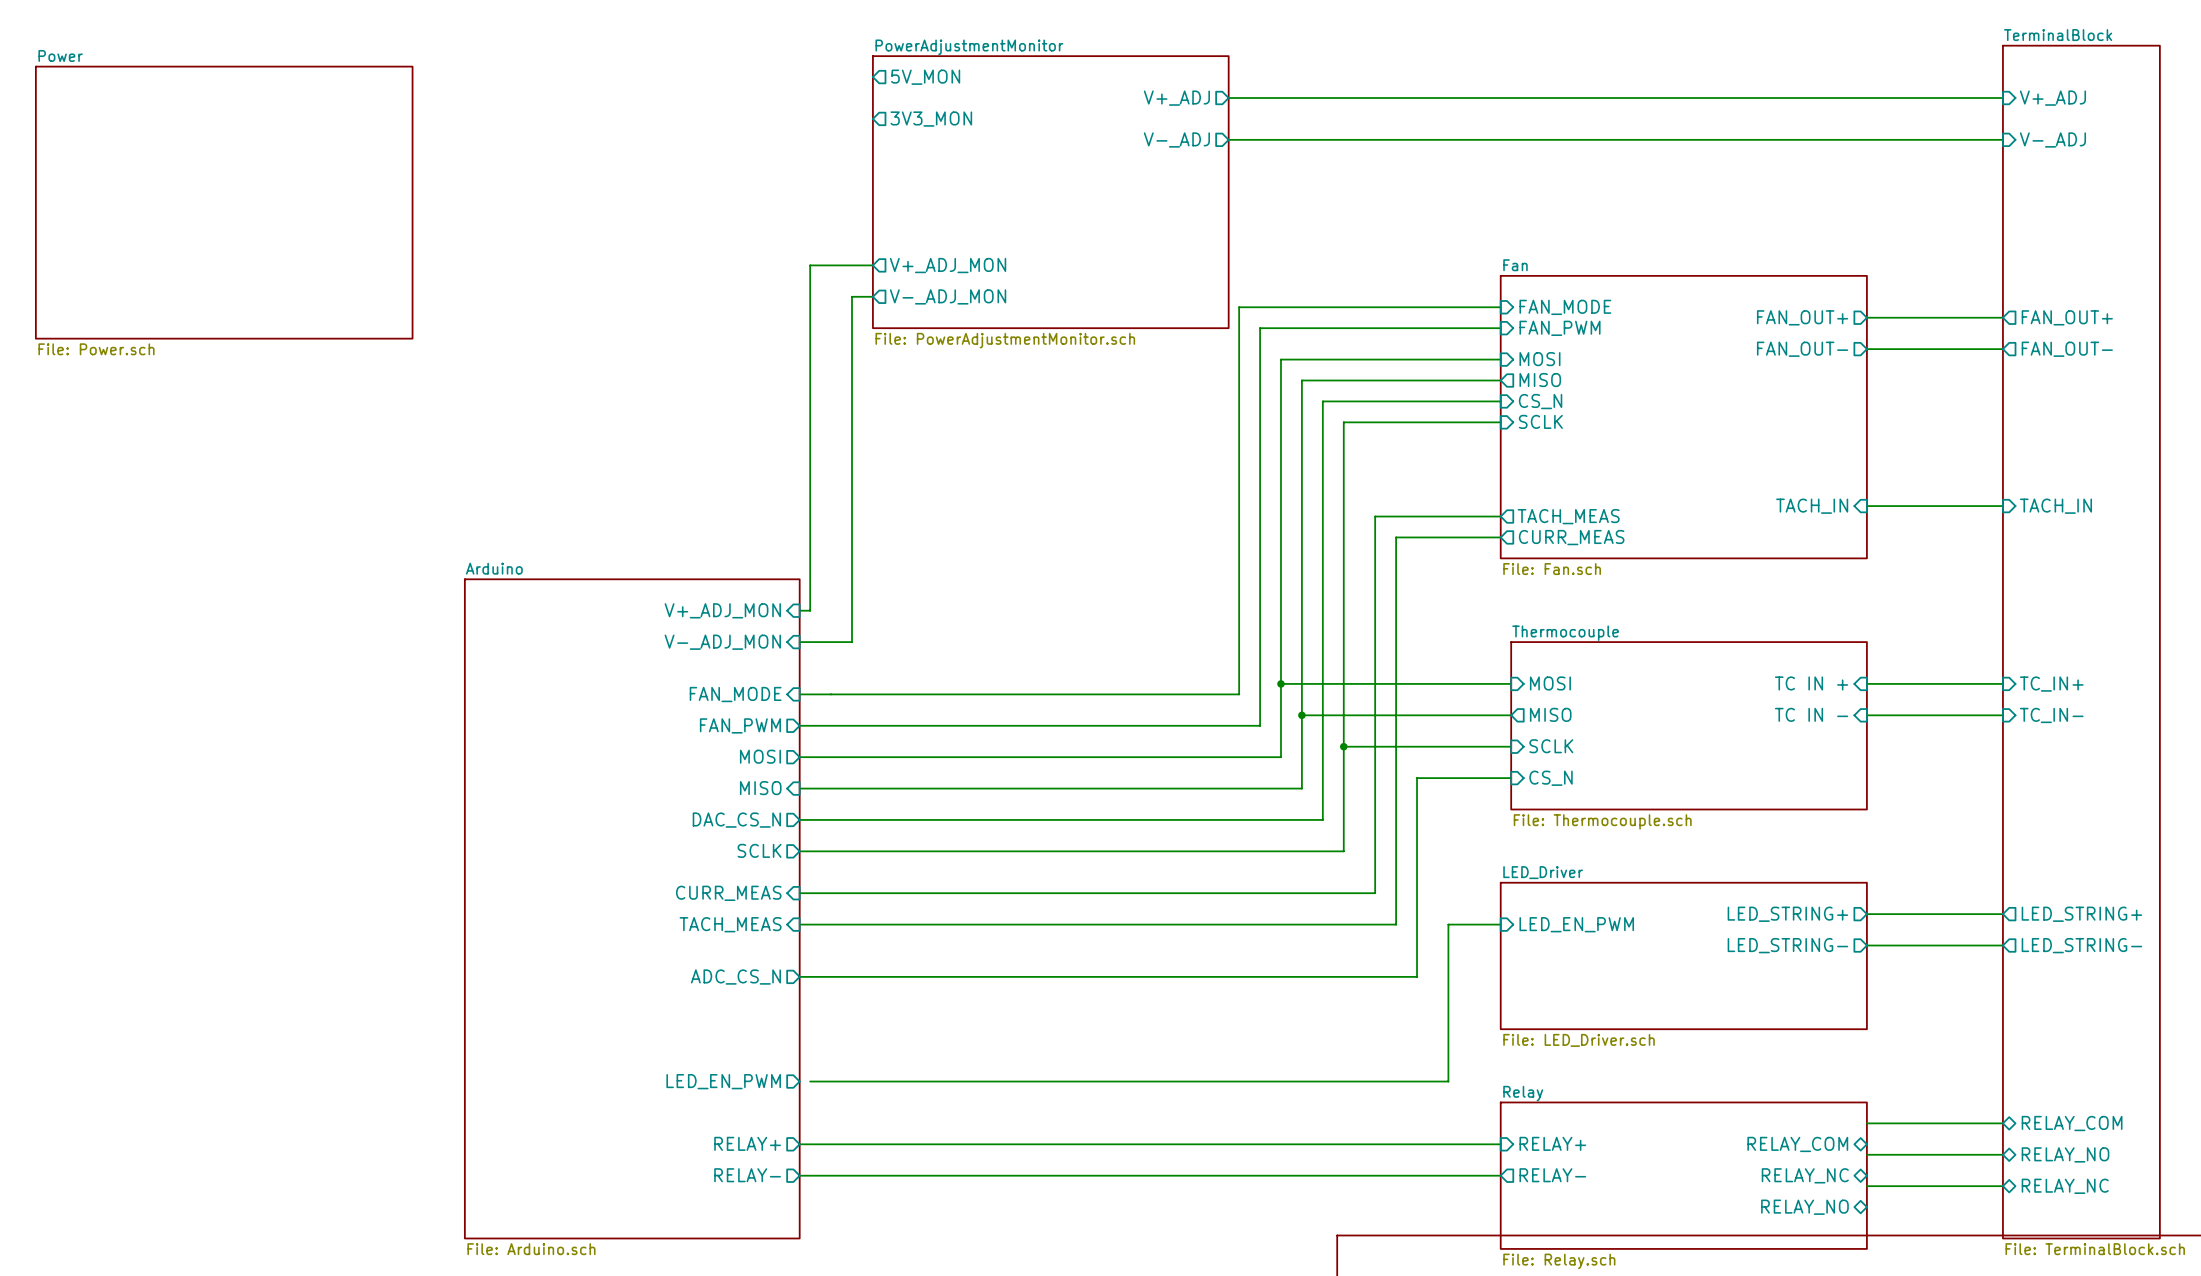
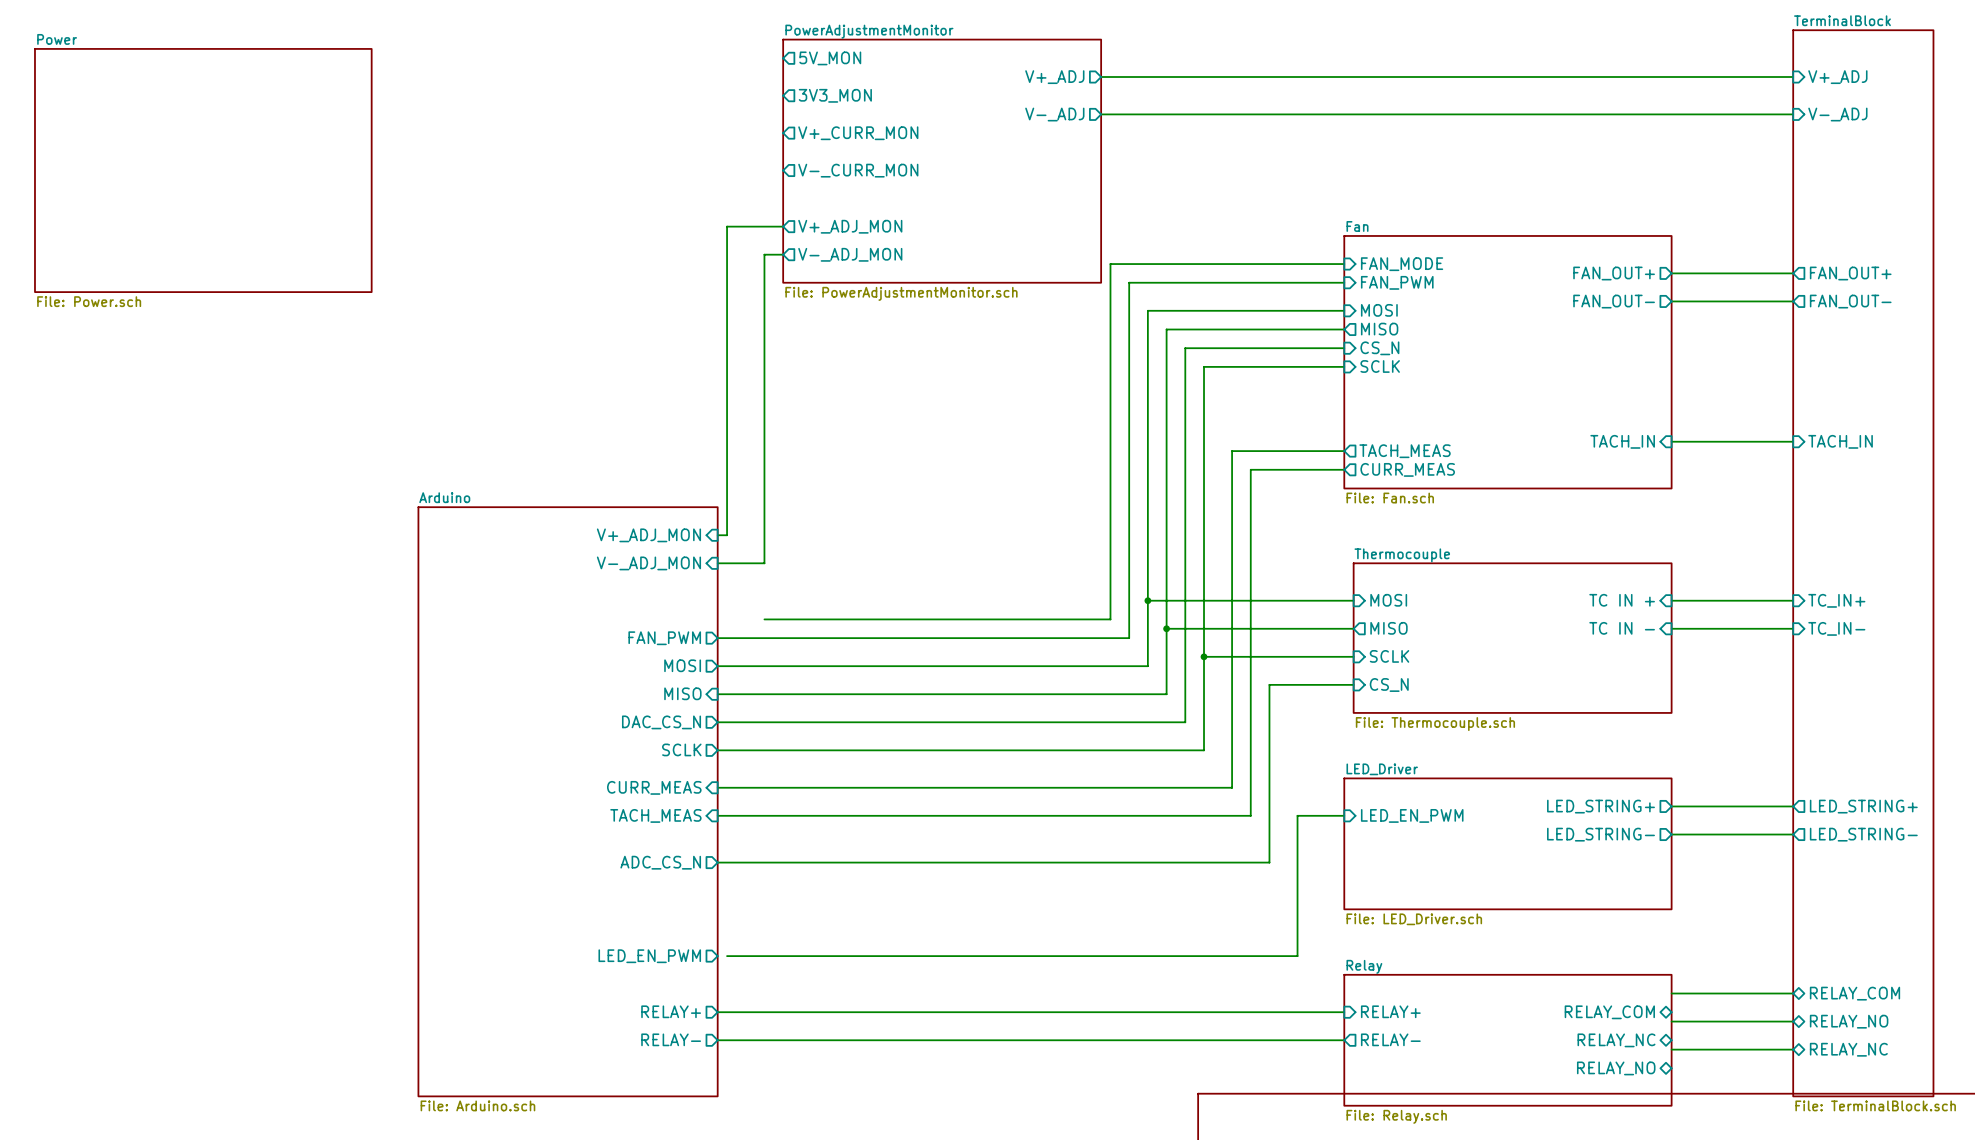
sheet pin: none -> V+_CURR_MON (858, 133)
sheet pin: none -> V-_CURR_MON (858, 170)
sheet pin: FAN_MODE (735, 694) -> none
wire: (799, 694) (1239, 694) -> (764, 619) (1110, 619) (1110, 610)

